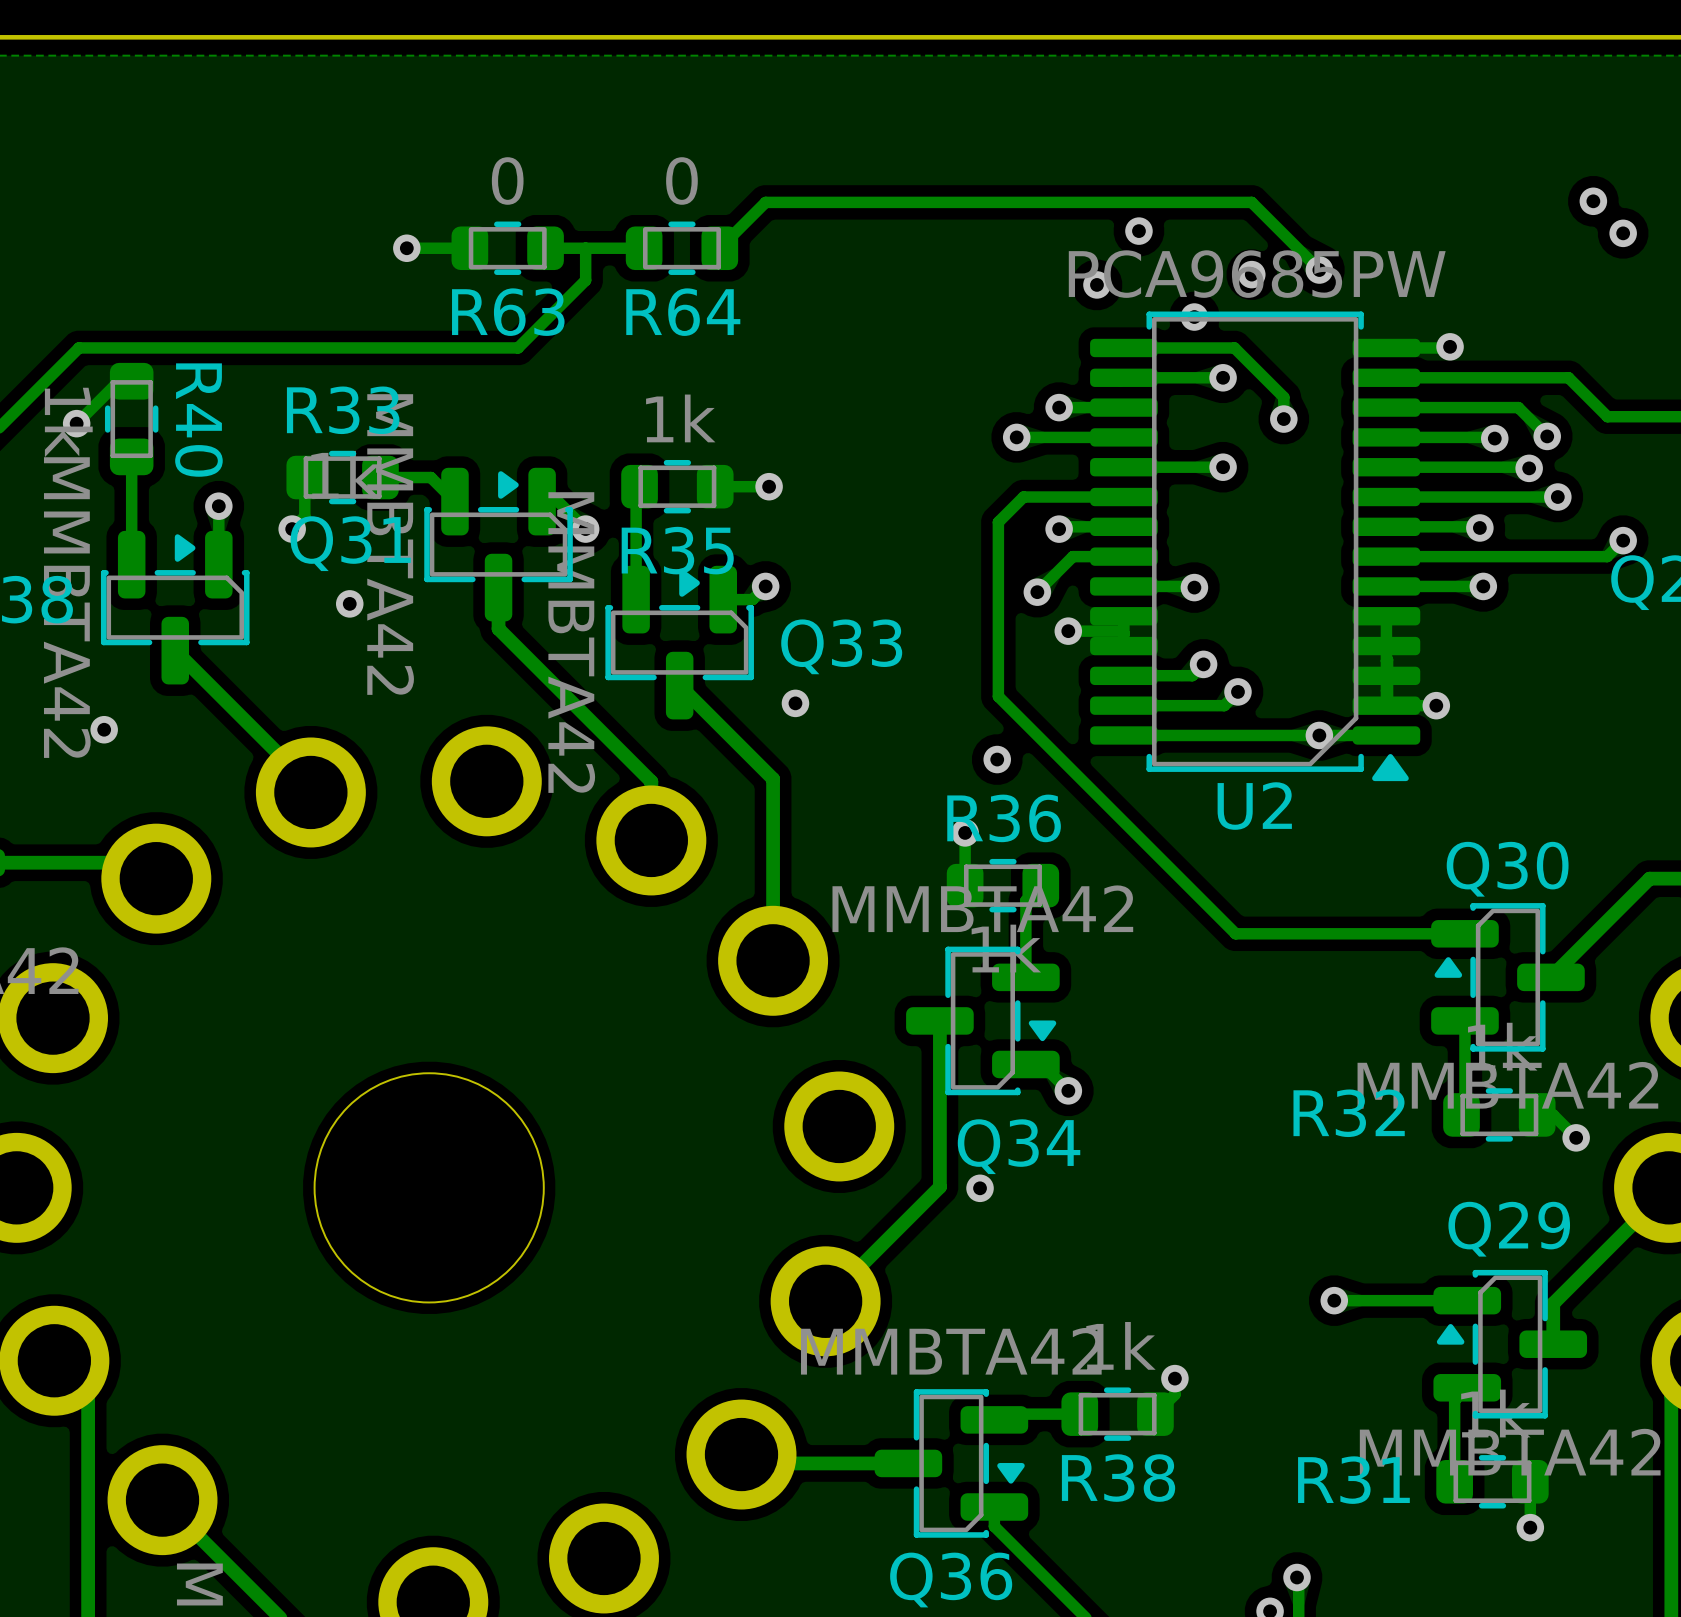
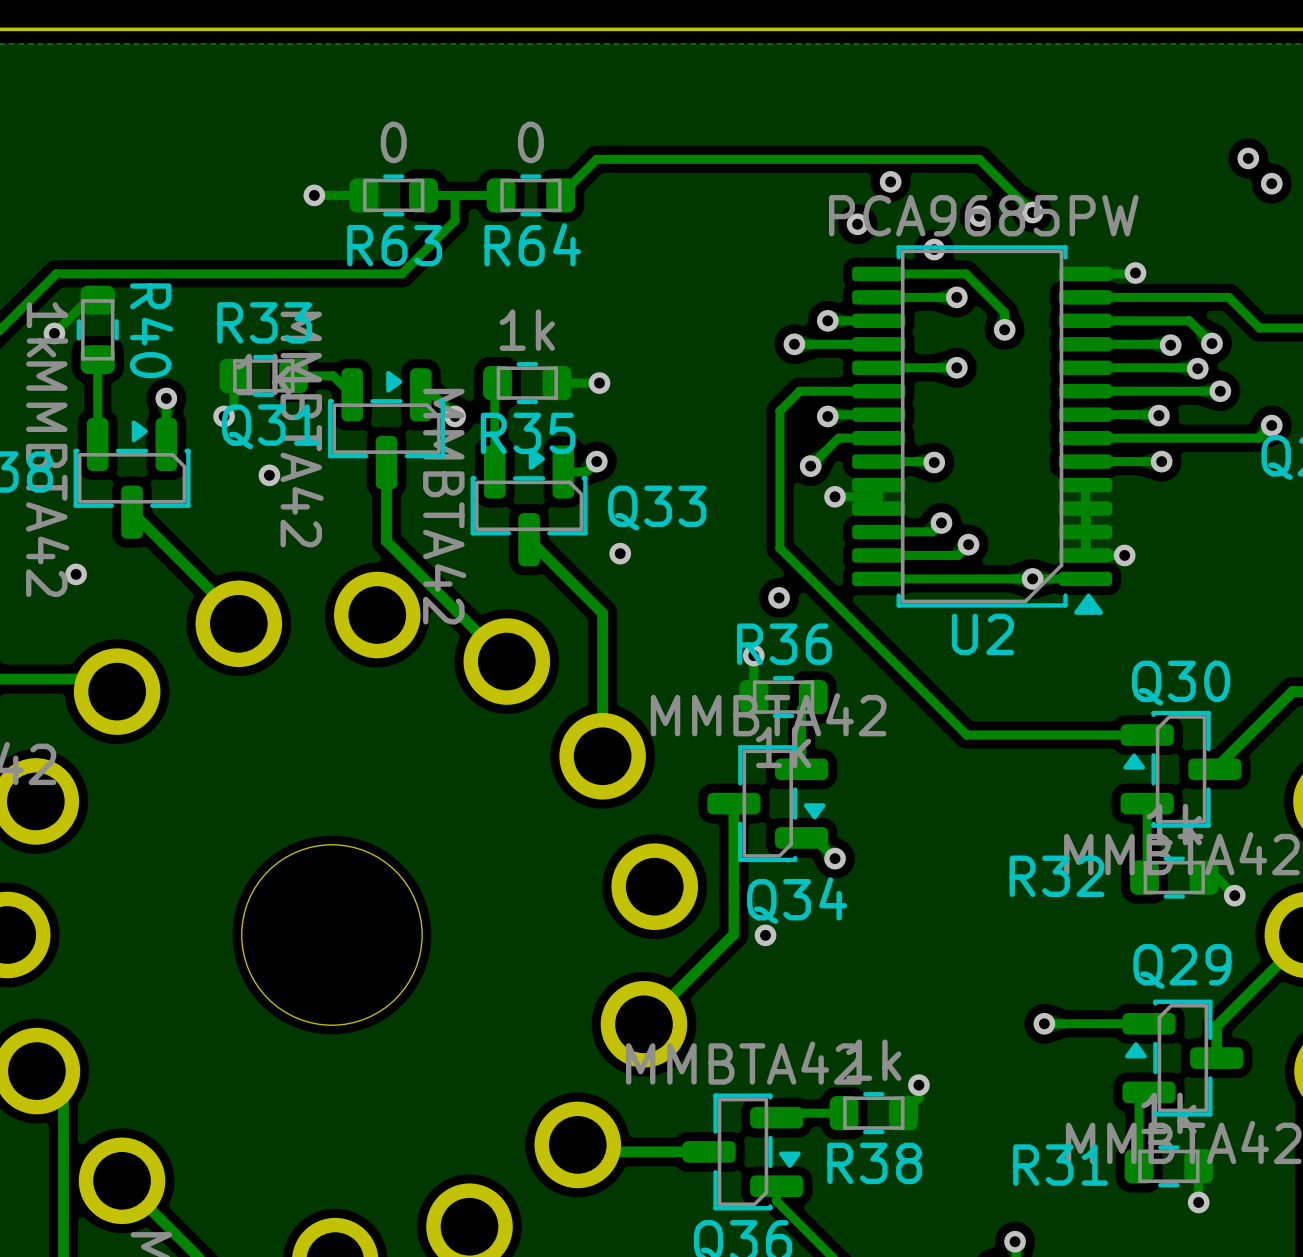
track: (498, 628) (651, 781) (651, 840) -> (386, 494) (386, 541) (506, 661)

